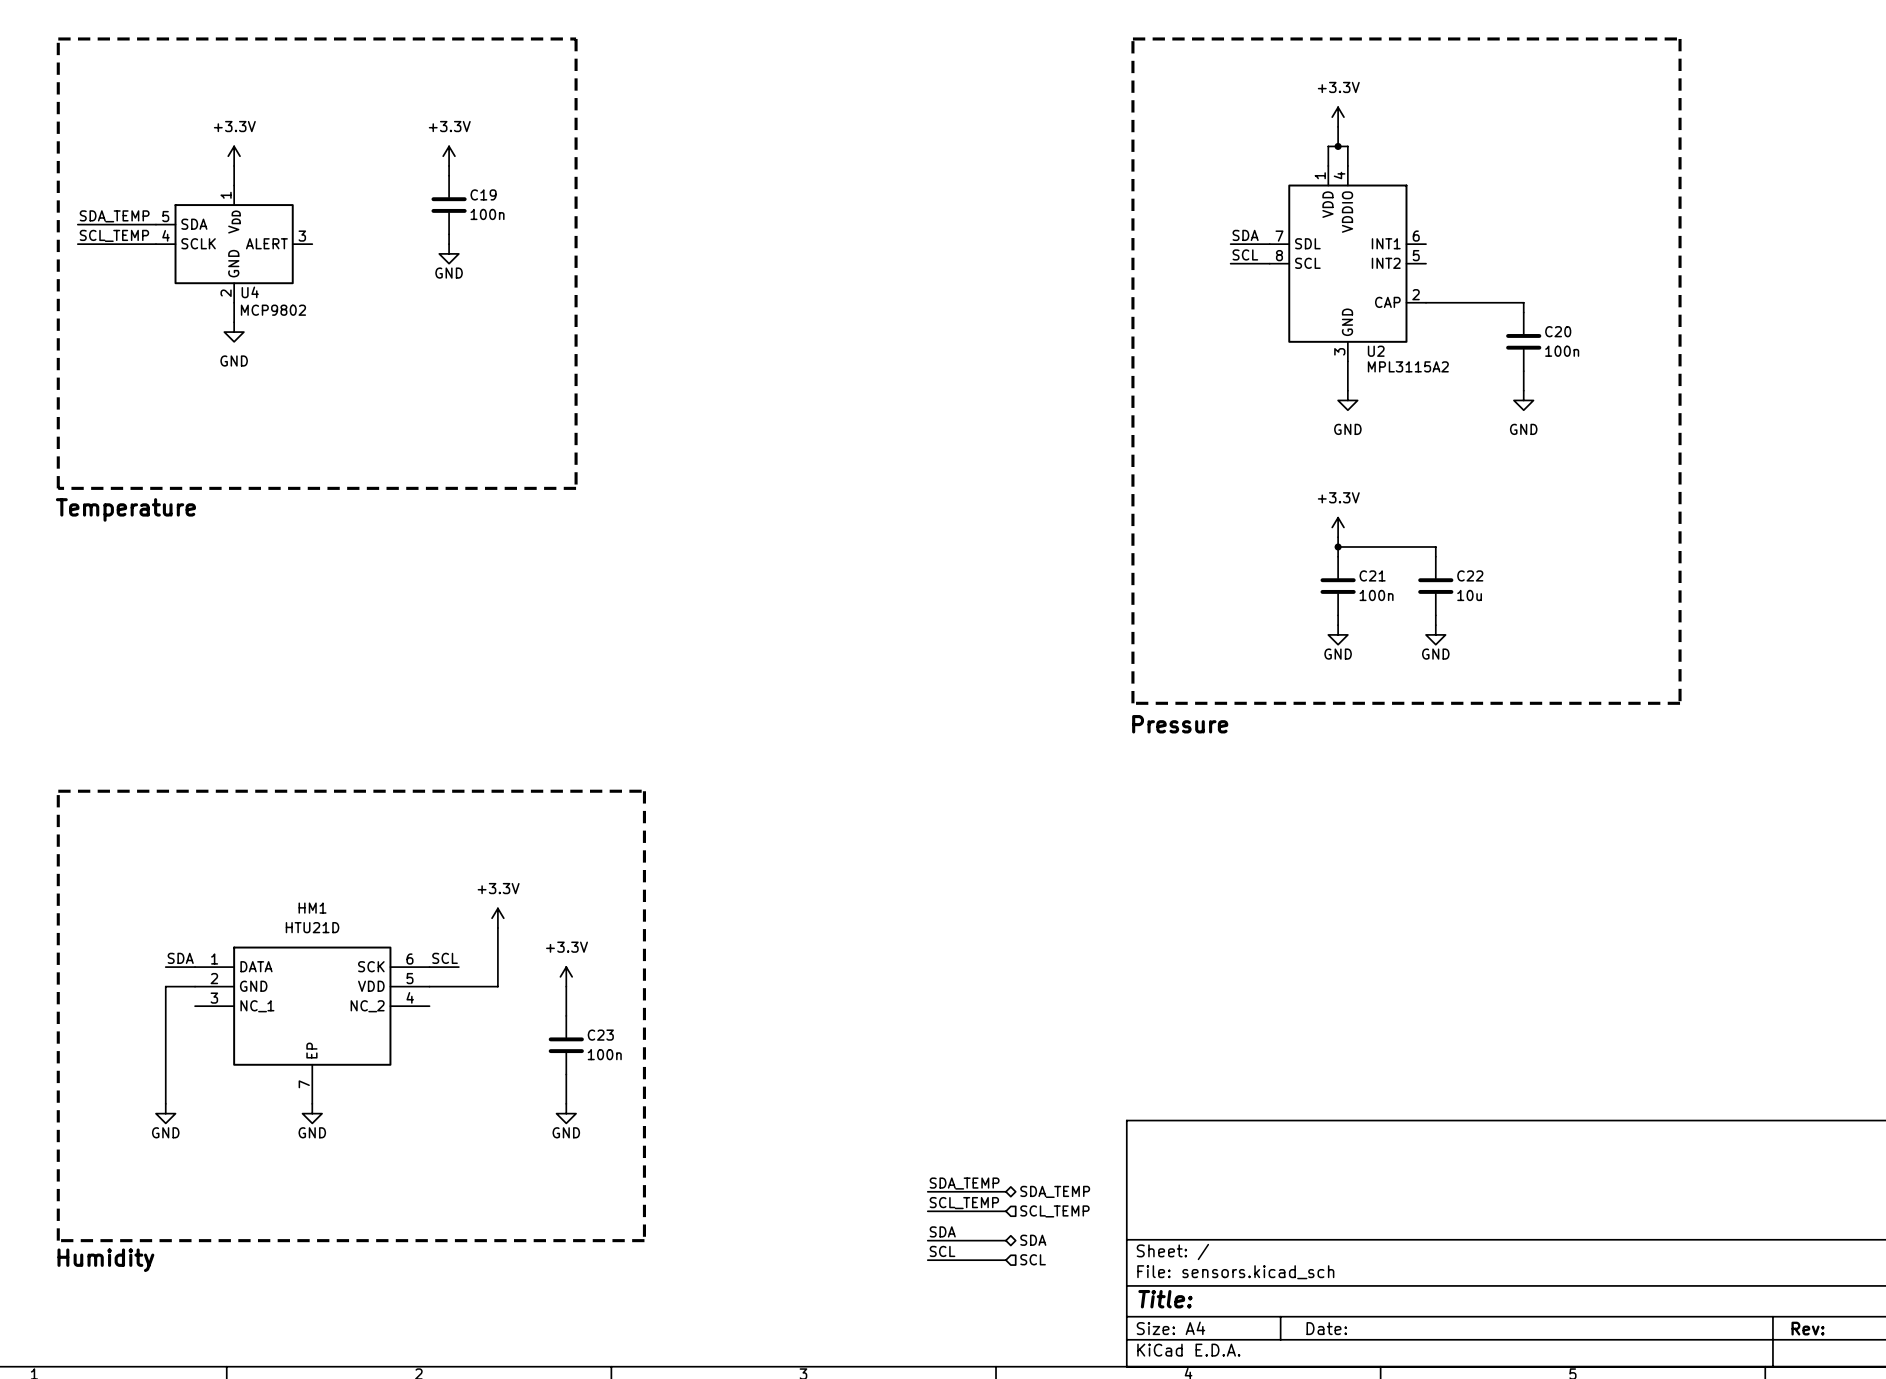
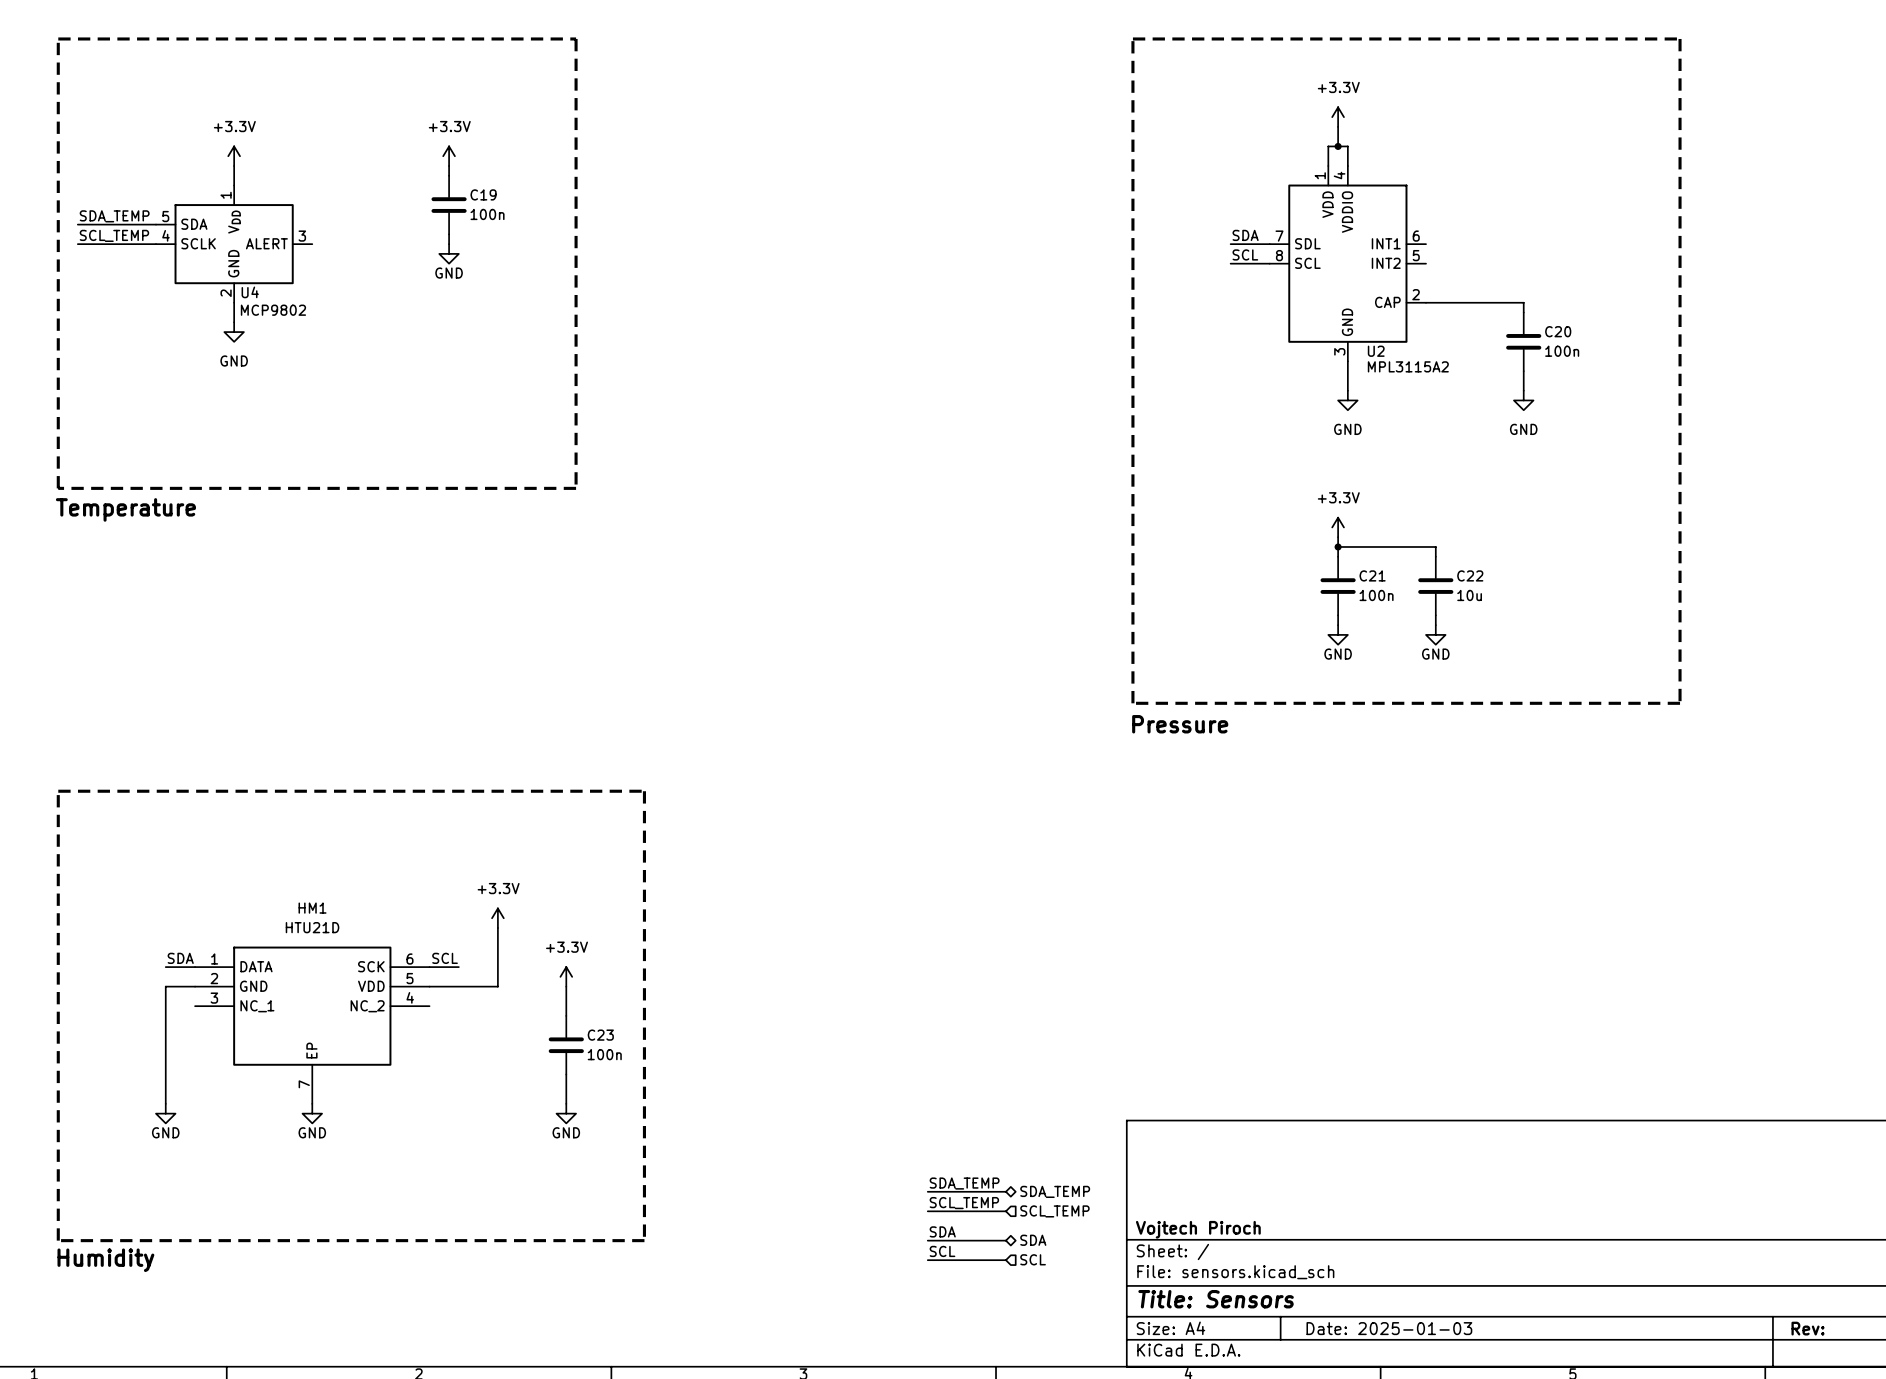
title block: none -> Vojtech Piroch (1198, 1229)
title block: Title: (1165, 1299) -> Title: Sensors (1216, 1299)
title block: Date: (1326, 1328) -> Date: 2025-01-03 (1389, 1328)

